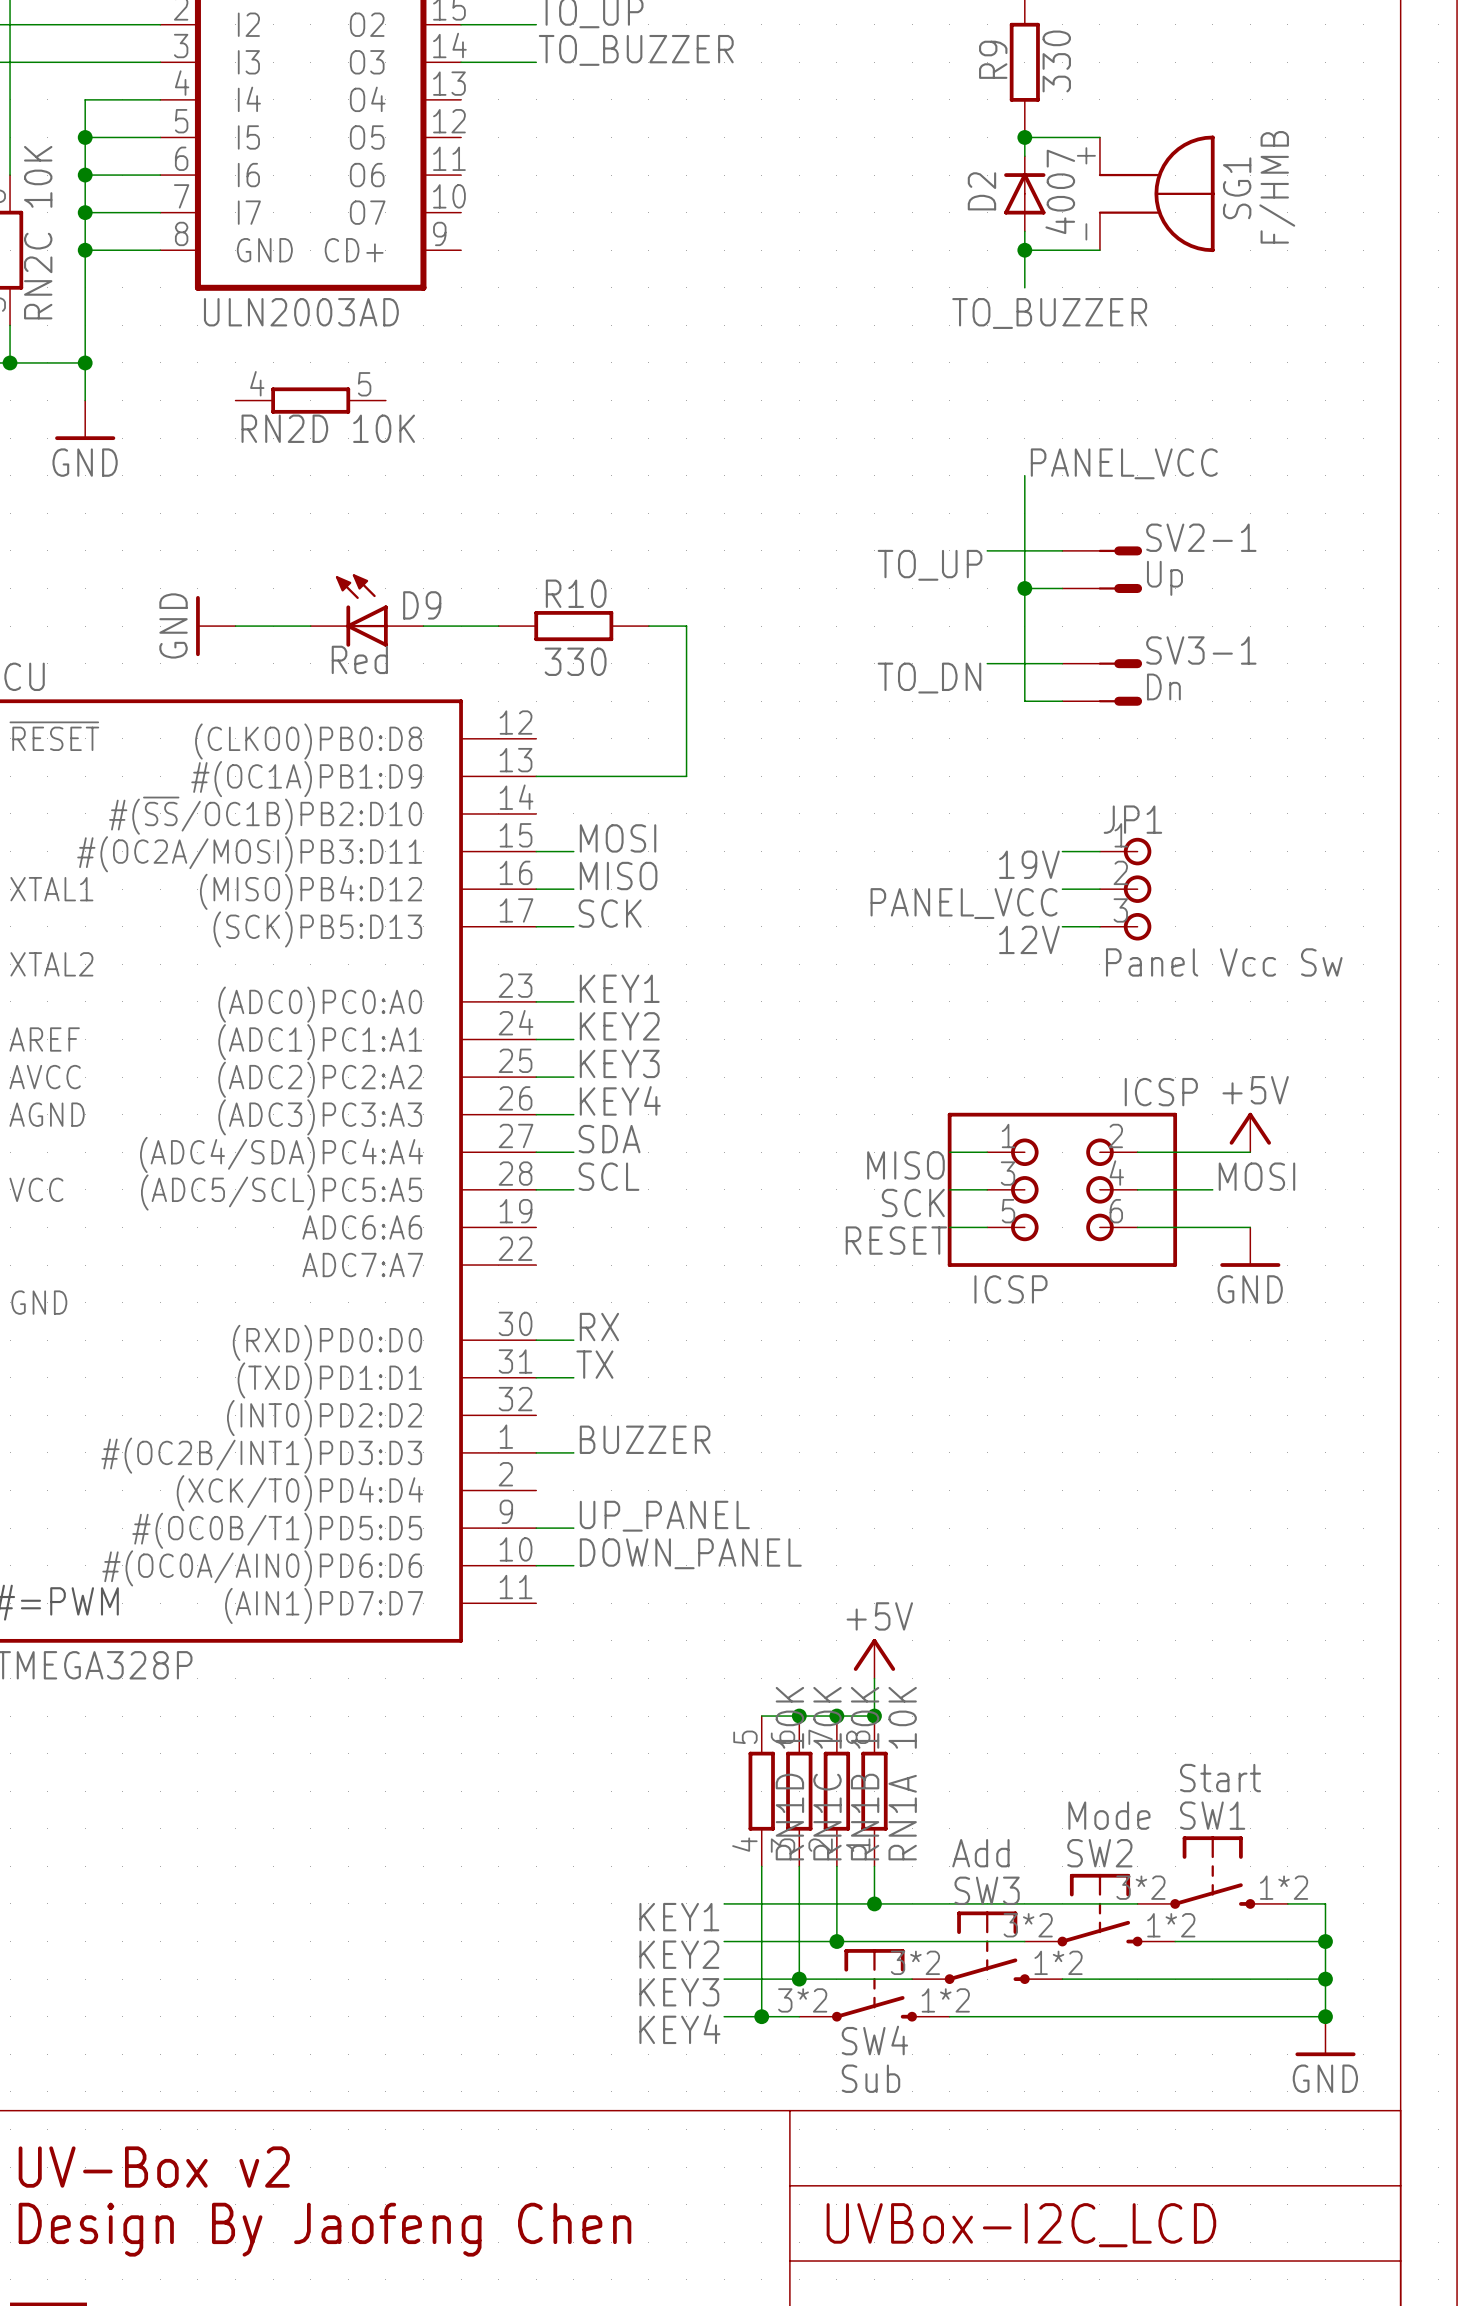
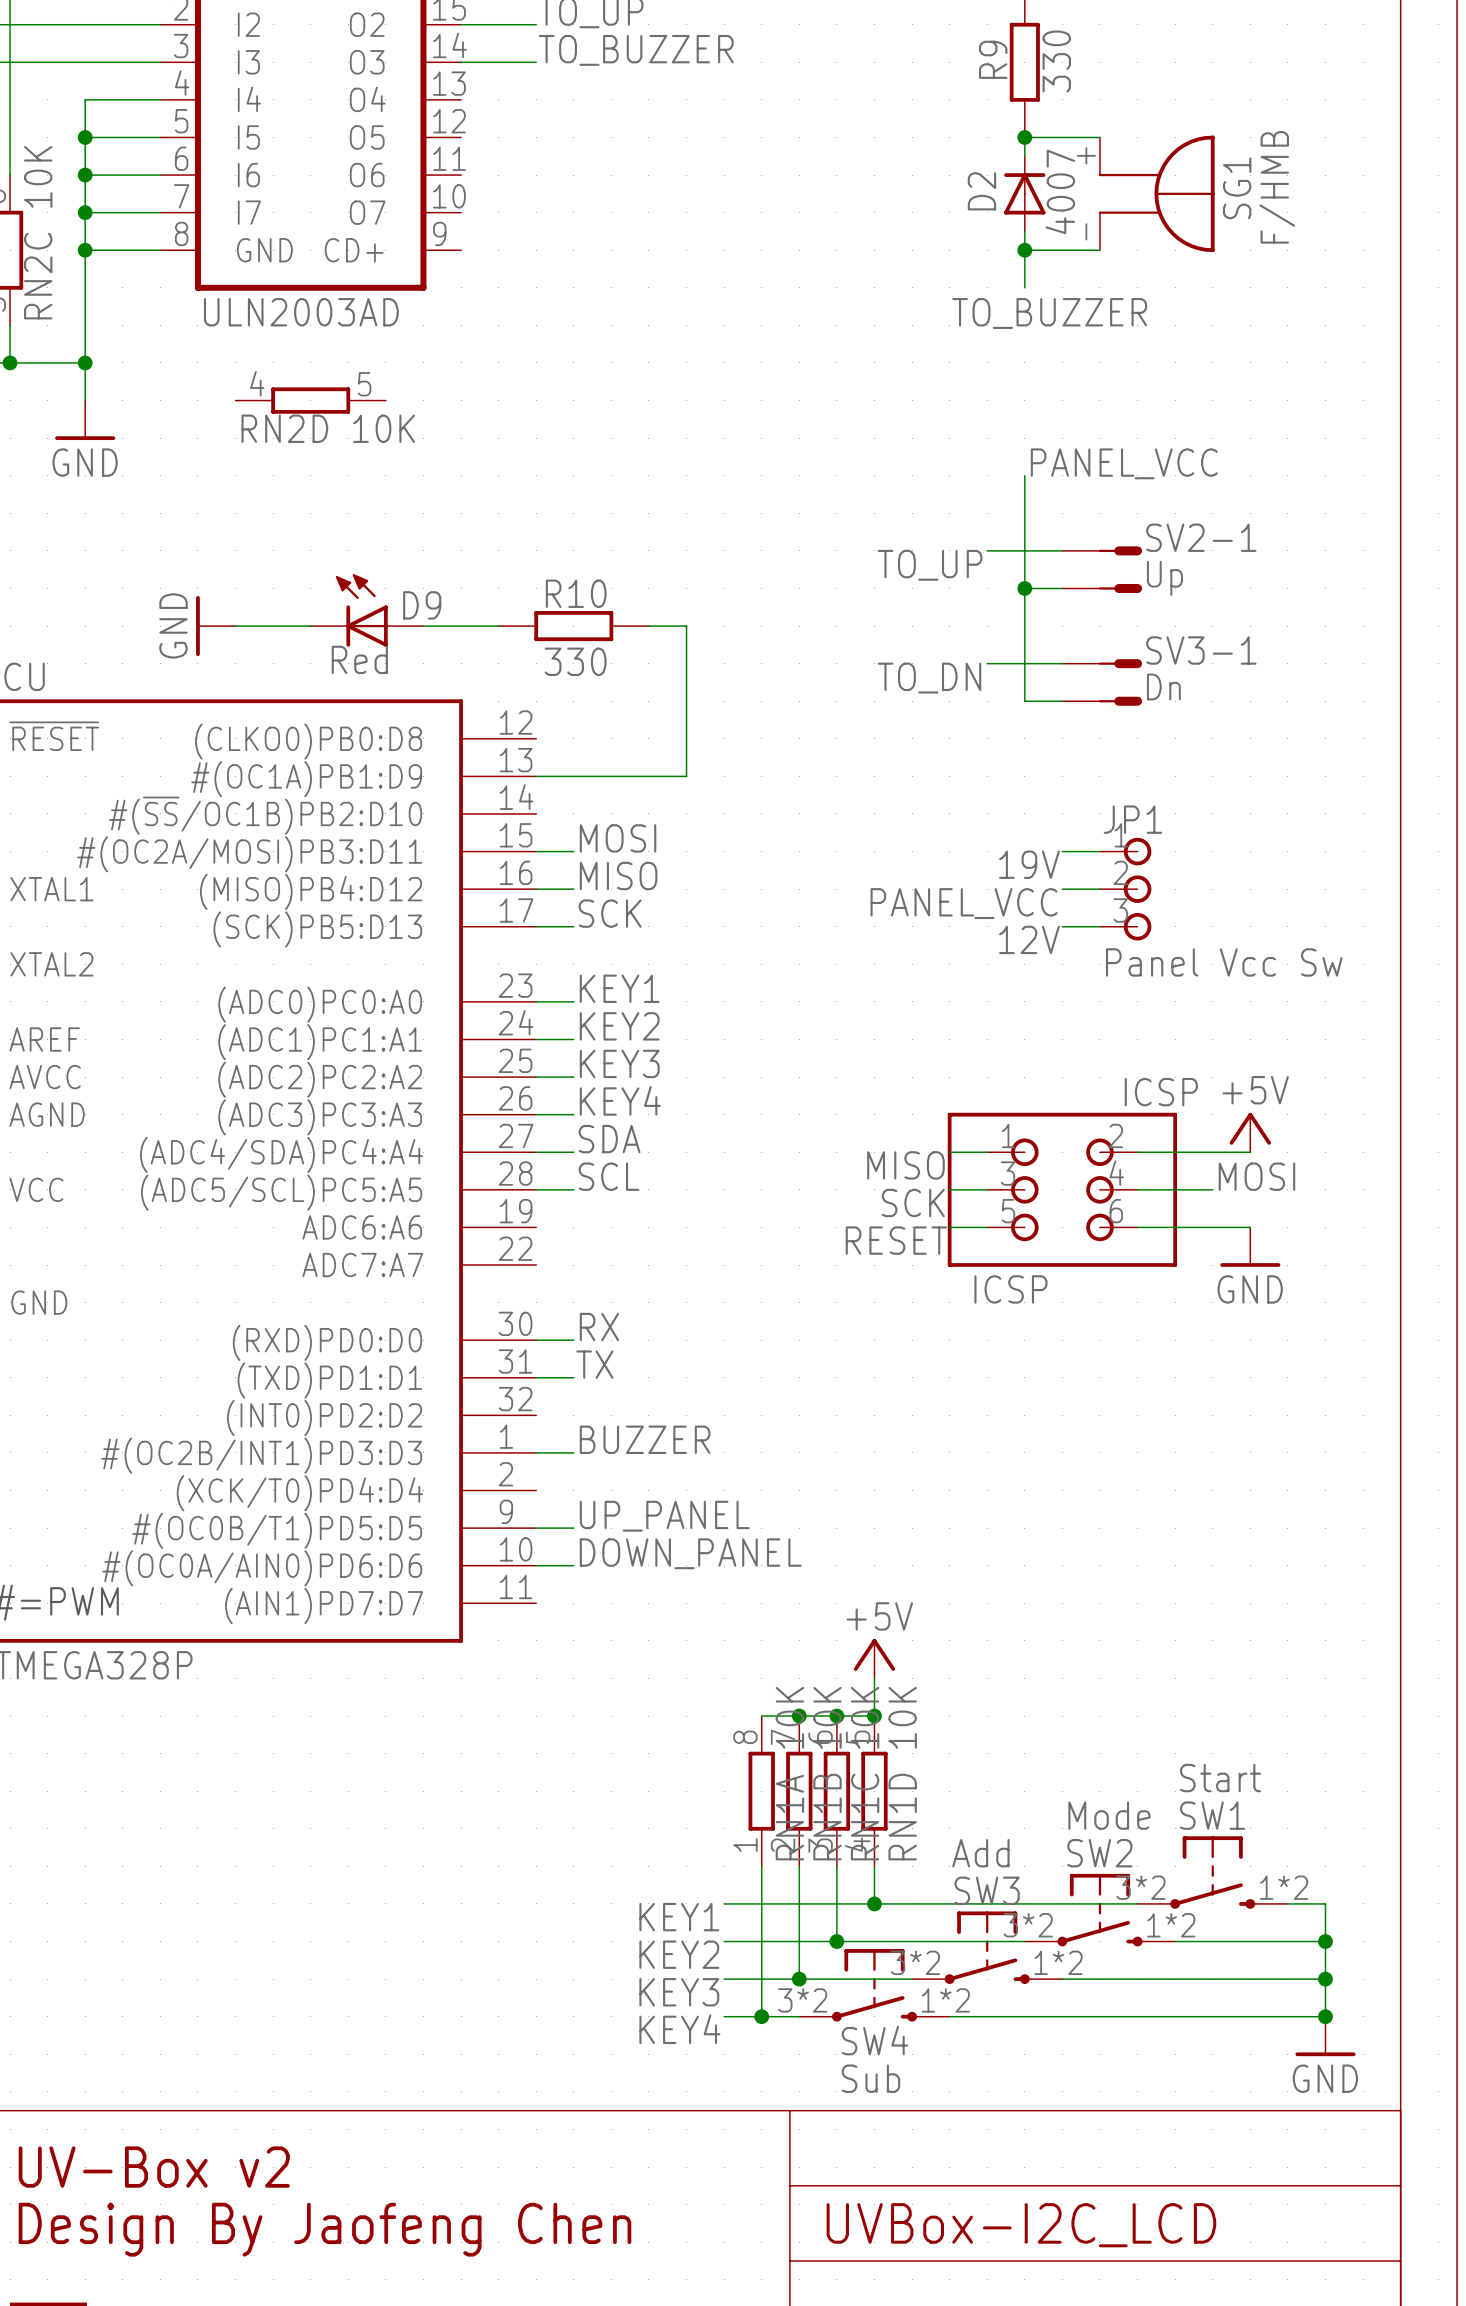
RN1D position: (761, 1791) -> (874, 1791)
RN1C position: (799, 1791) -> (836, 1791)
RN1B position: (836, 1791) -> (799, 1791)
RN1A position: (874, 1791) -> (761, 1791)

